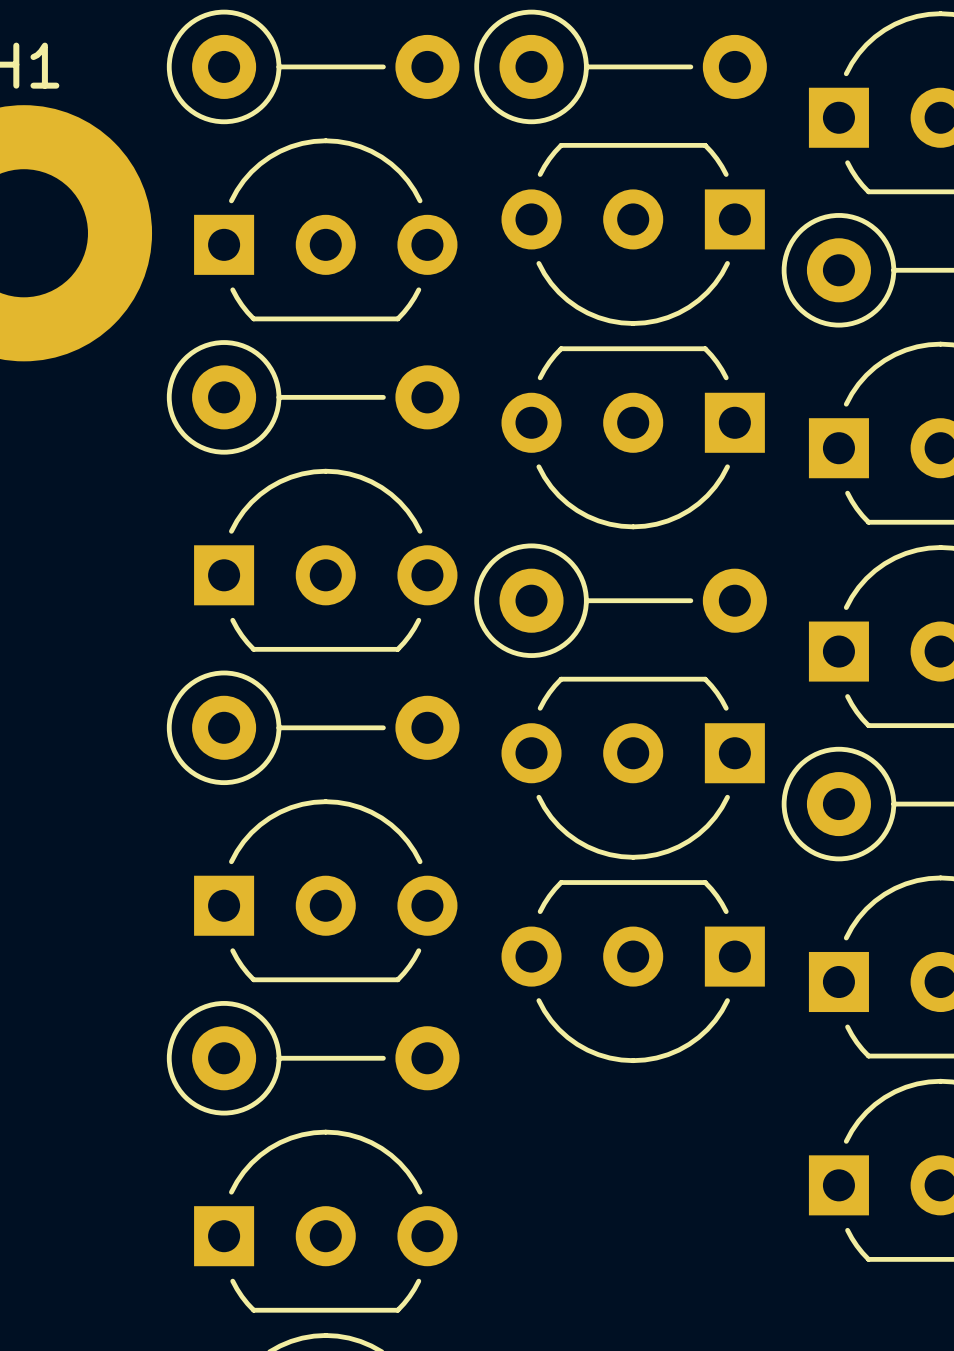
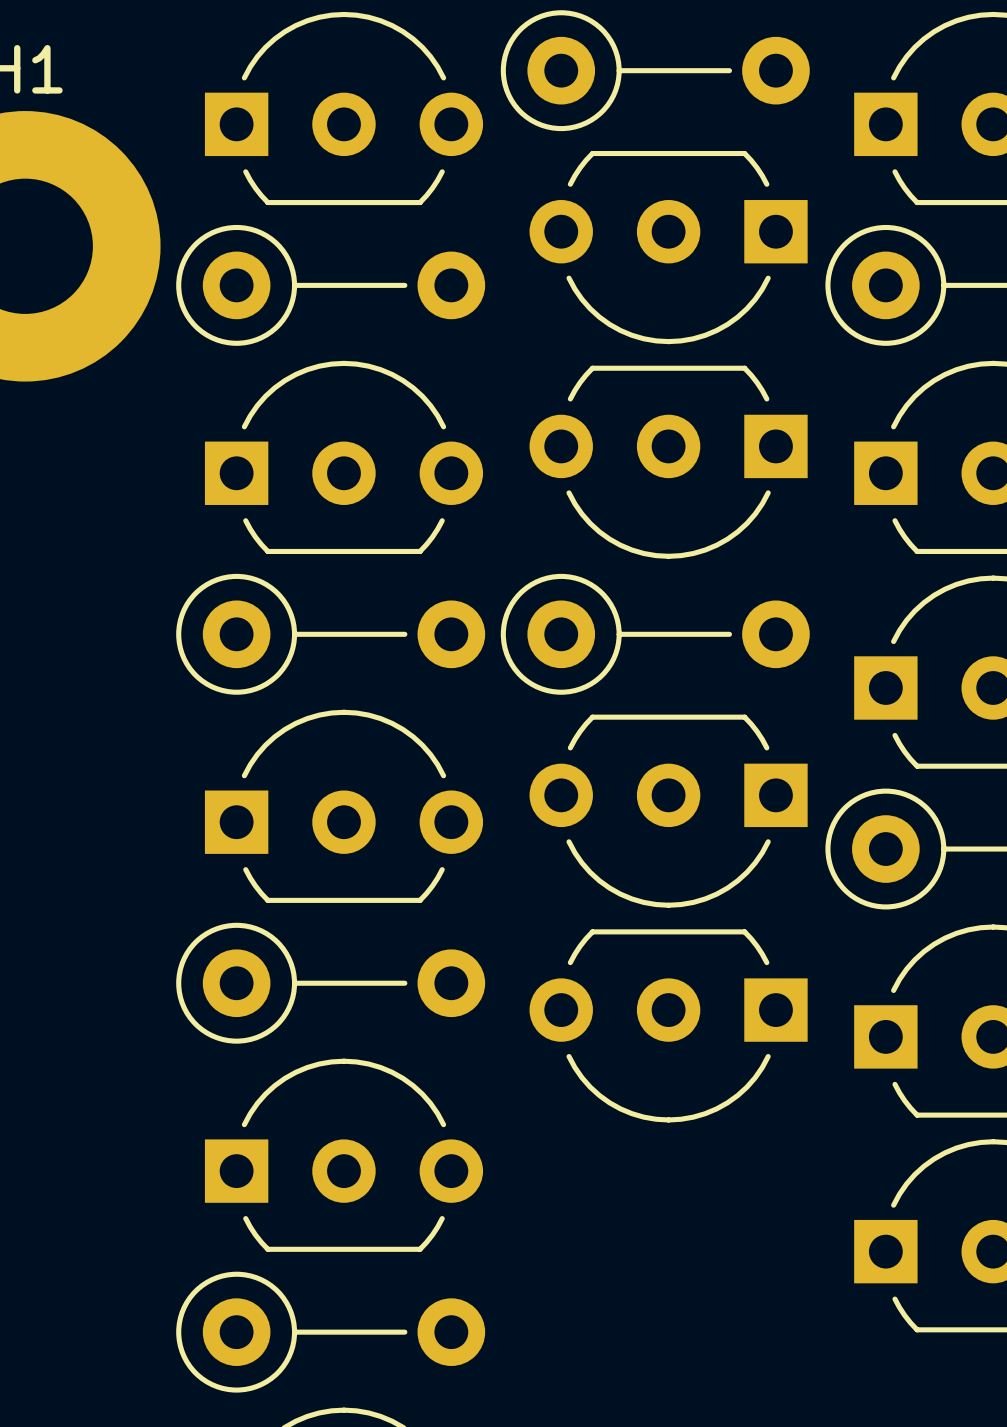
part footprint: [166, 9, 460, 125] -> [204, 11, 484, 206]
part: (325, 229) -> none
part: none -> (330, 285)
part footprint: [166, 340, 460, 455] -> [204, 360, 484, 555]
part: (325, 560) -> none
part: none -> (330, 634)
part footprint: [166, 670, 460, 786] -> [204, 709, 484, 903]
part: (325, 890) -> none
part: none -> (330, 983)
part footprint: [166, 1001, 460, 1116] -> [204, 1058, 484, 1252]
part: (325, 1221) -> none
part: none -> (330, 1332)

